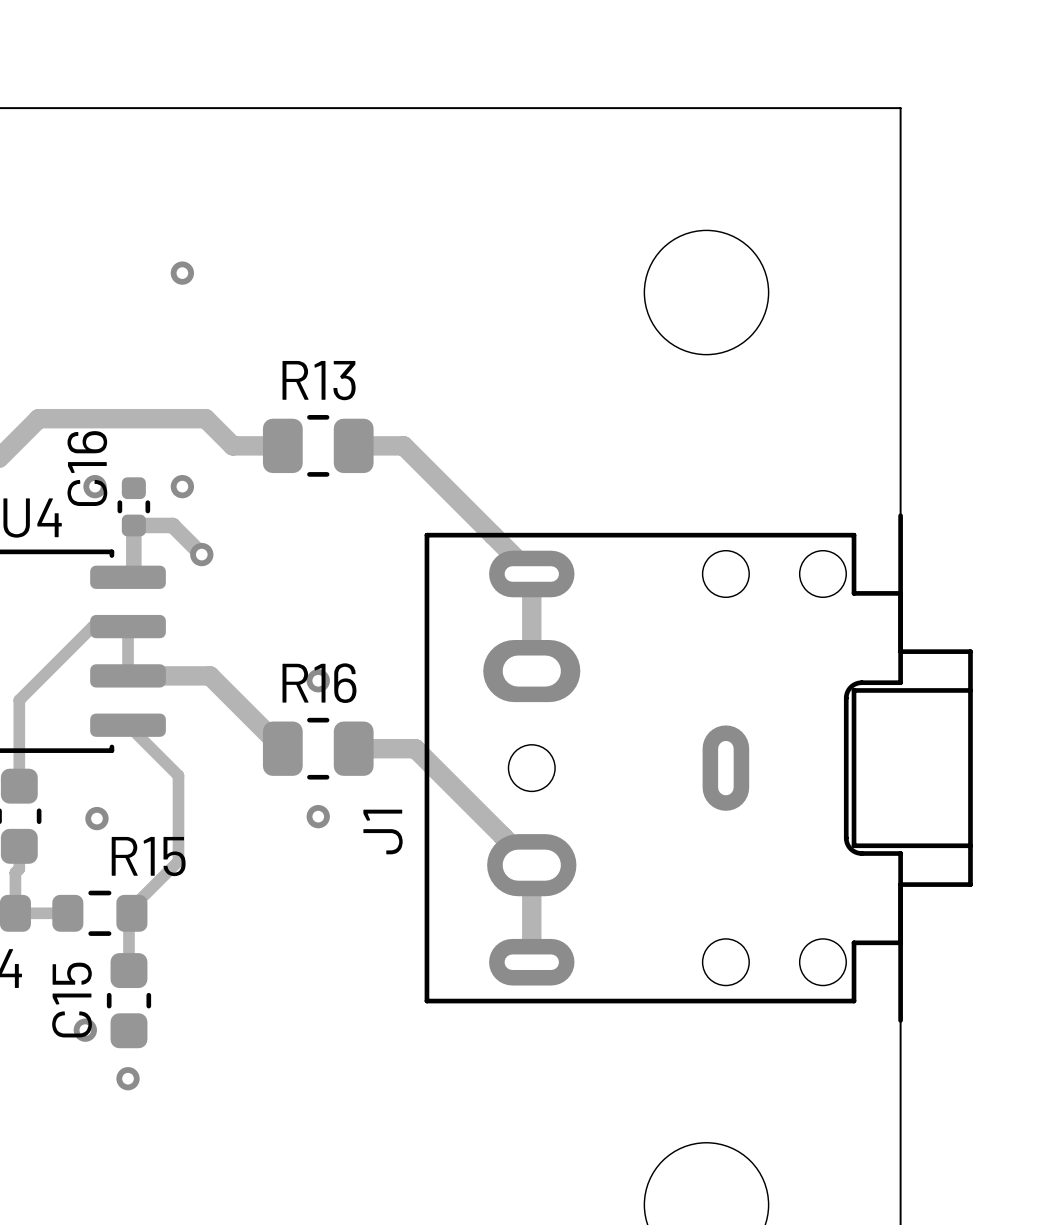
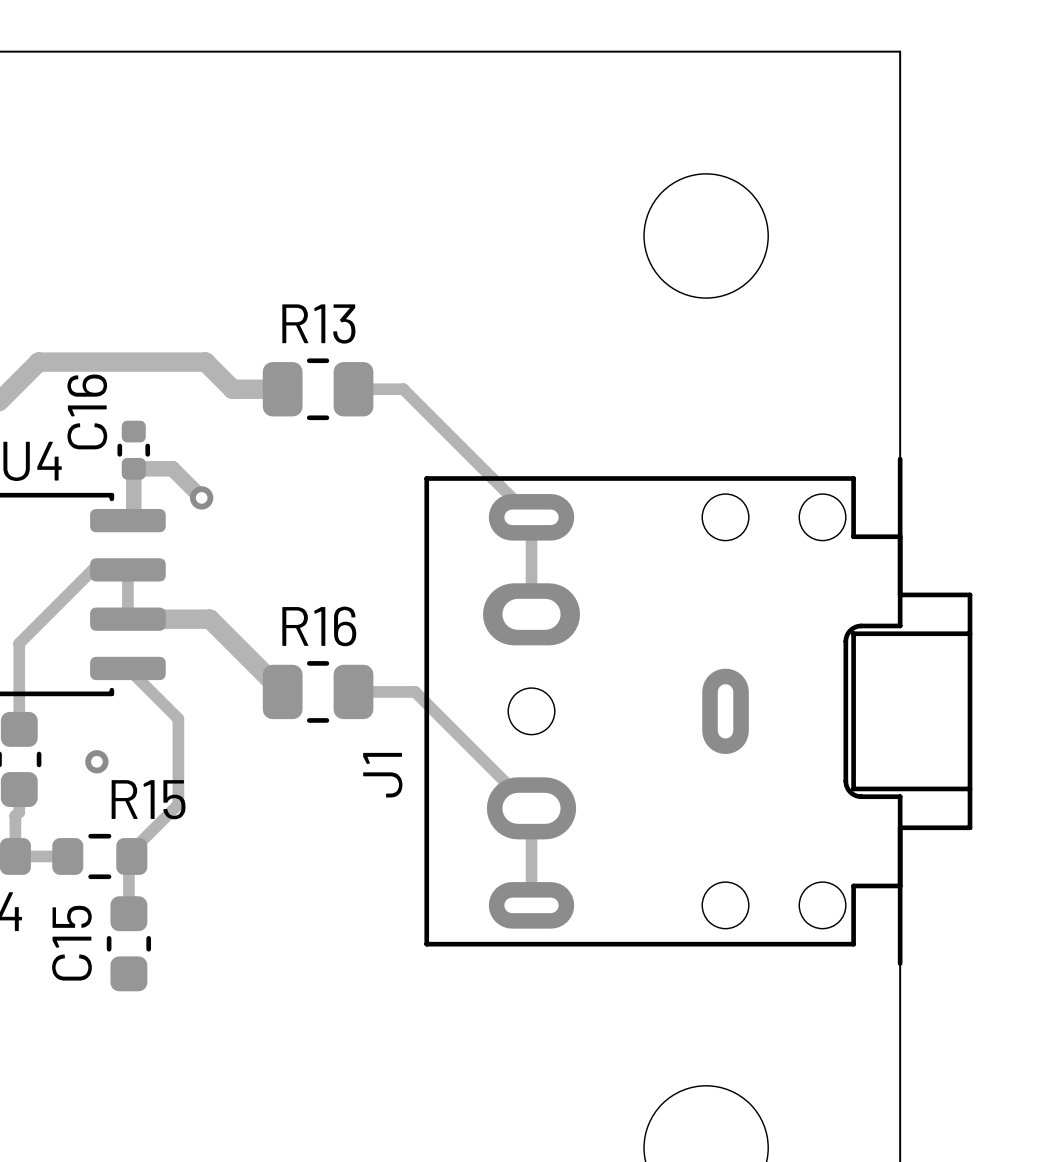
via: (182, 273) -> none
track width: thick (353, 445) (403, 445) (531, 573) (531, 671) -> thin (353, 389) (403, 389) (531, 517) (531, 614)
via: (95, 486) -> none
via: (182, 486) -> none
via: (318, 680) -> none
track width: thick (353, 748) (415, 748) (531, 865) (531, 962) -> thin (353, 691) (415, 691) (531, 808) (531, 905)
via: (318, 816) -> none
via: (85, 1030) -> none
via: (128, 1078) -> none

